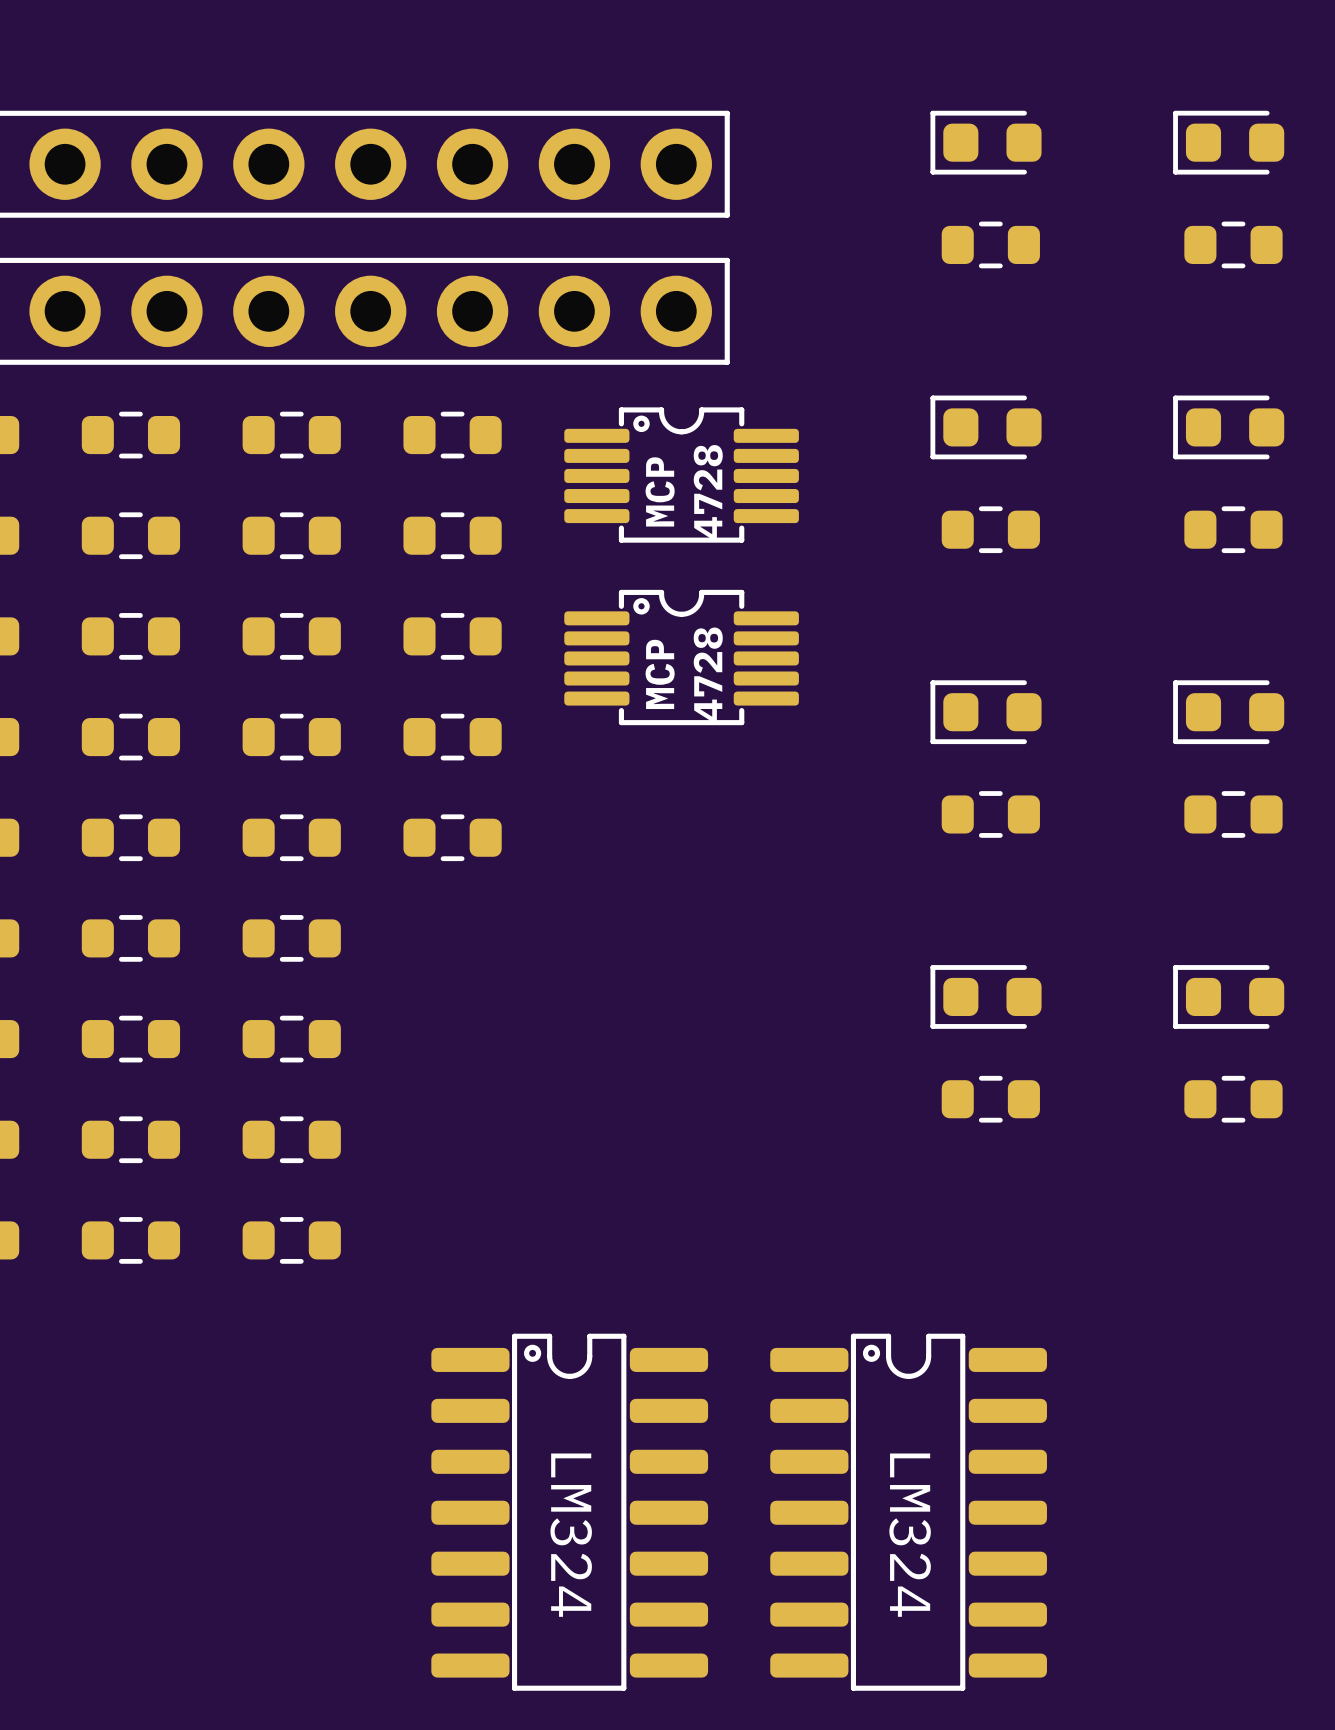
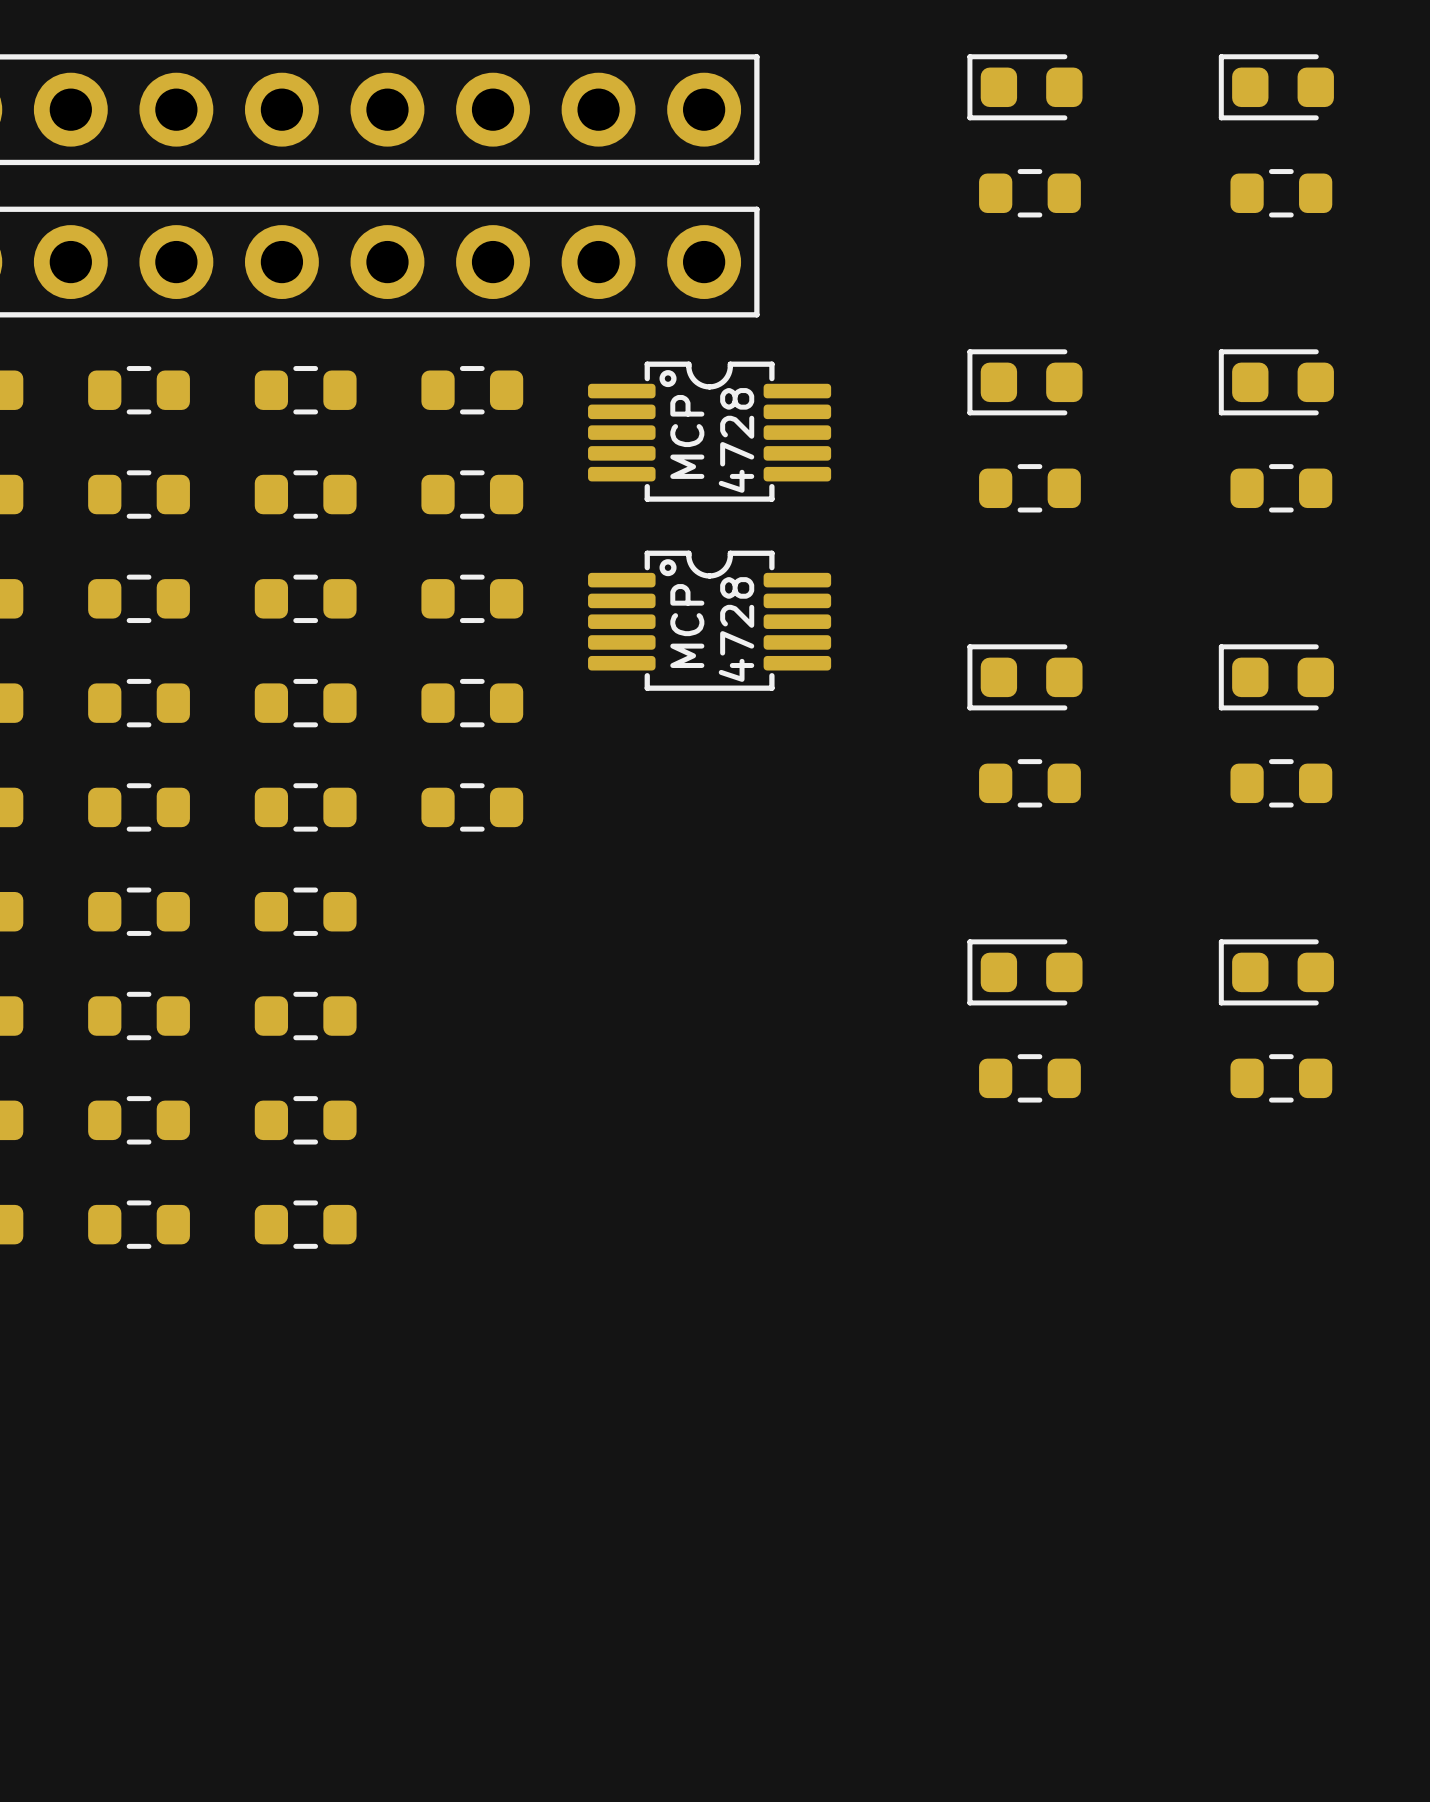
part: (569, 1512) -> none
part: (908, 1512) -> none

